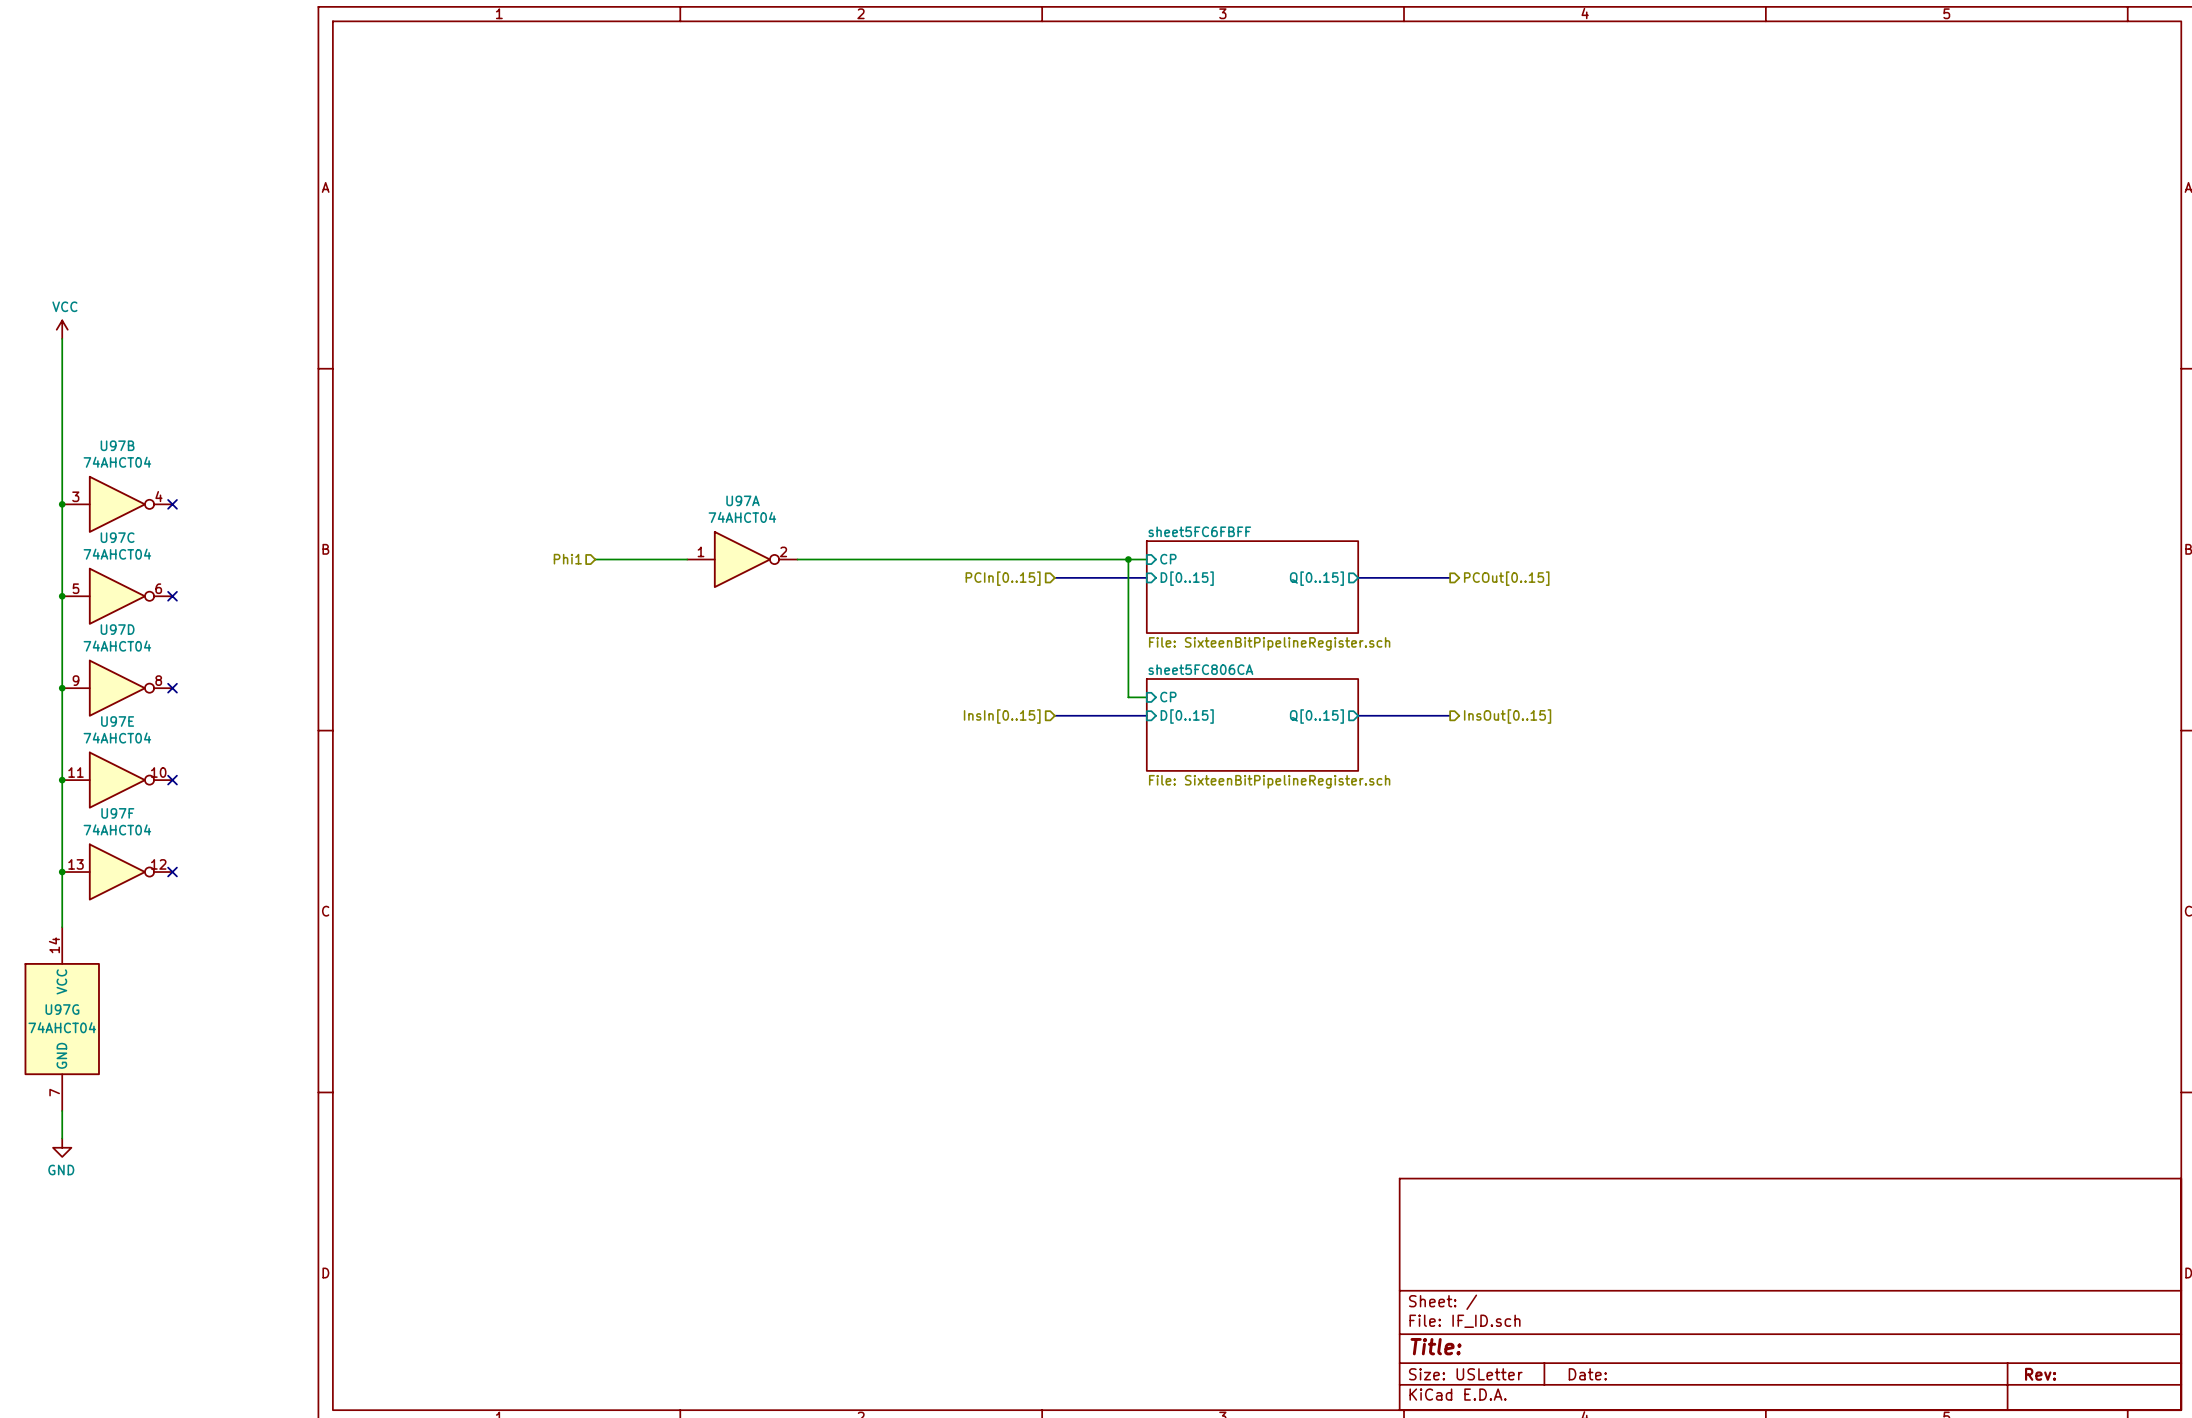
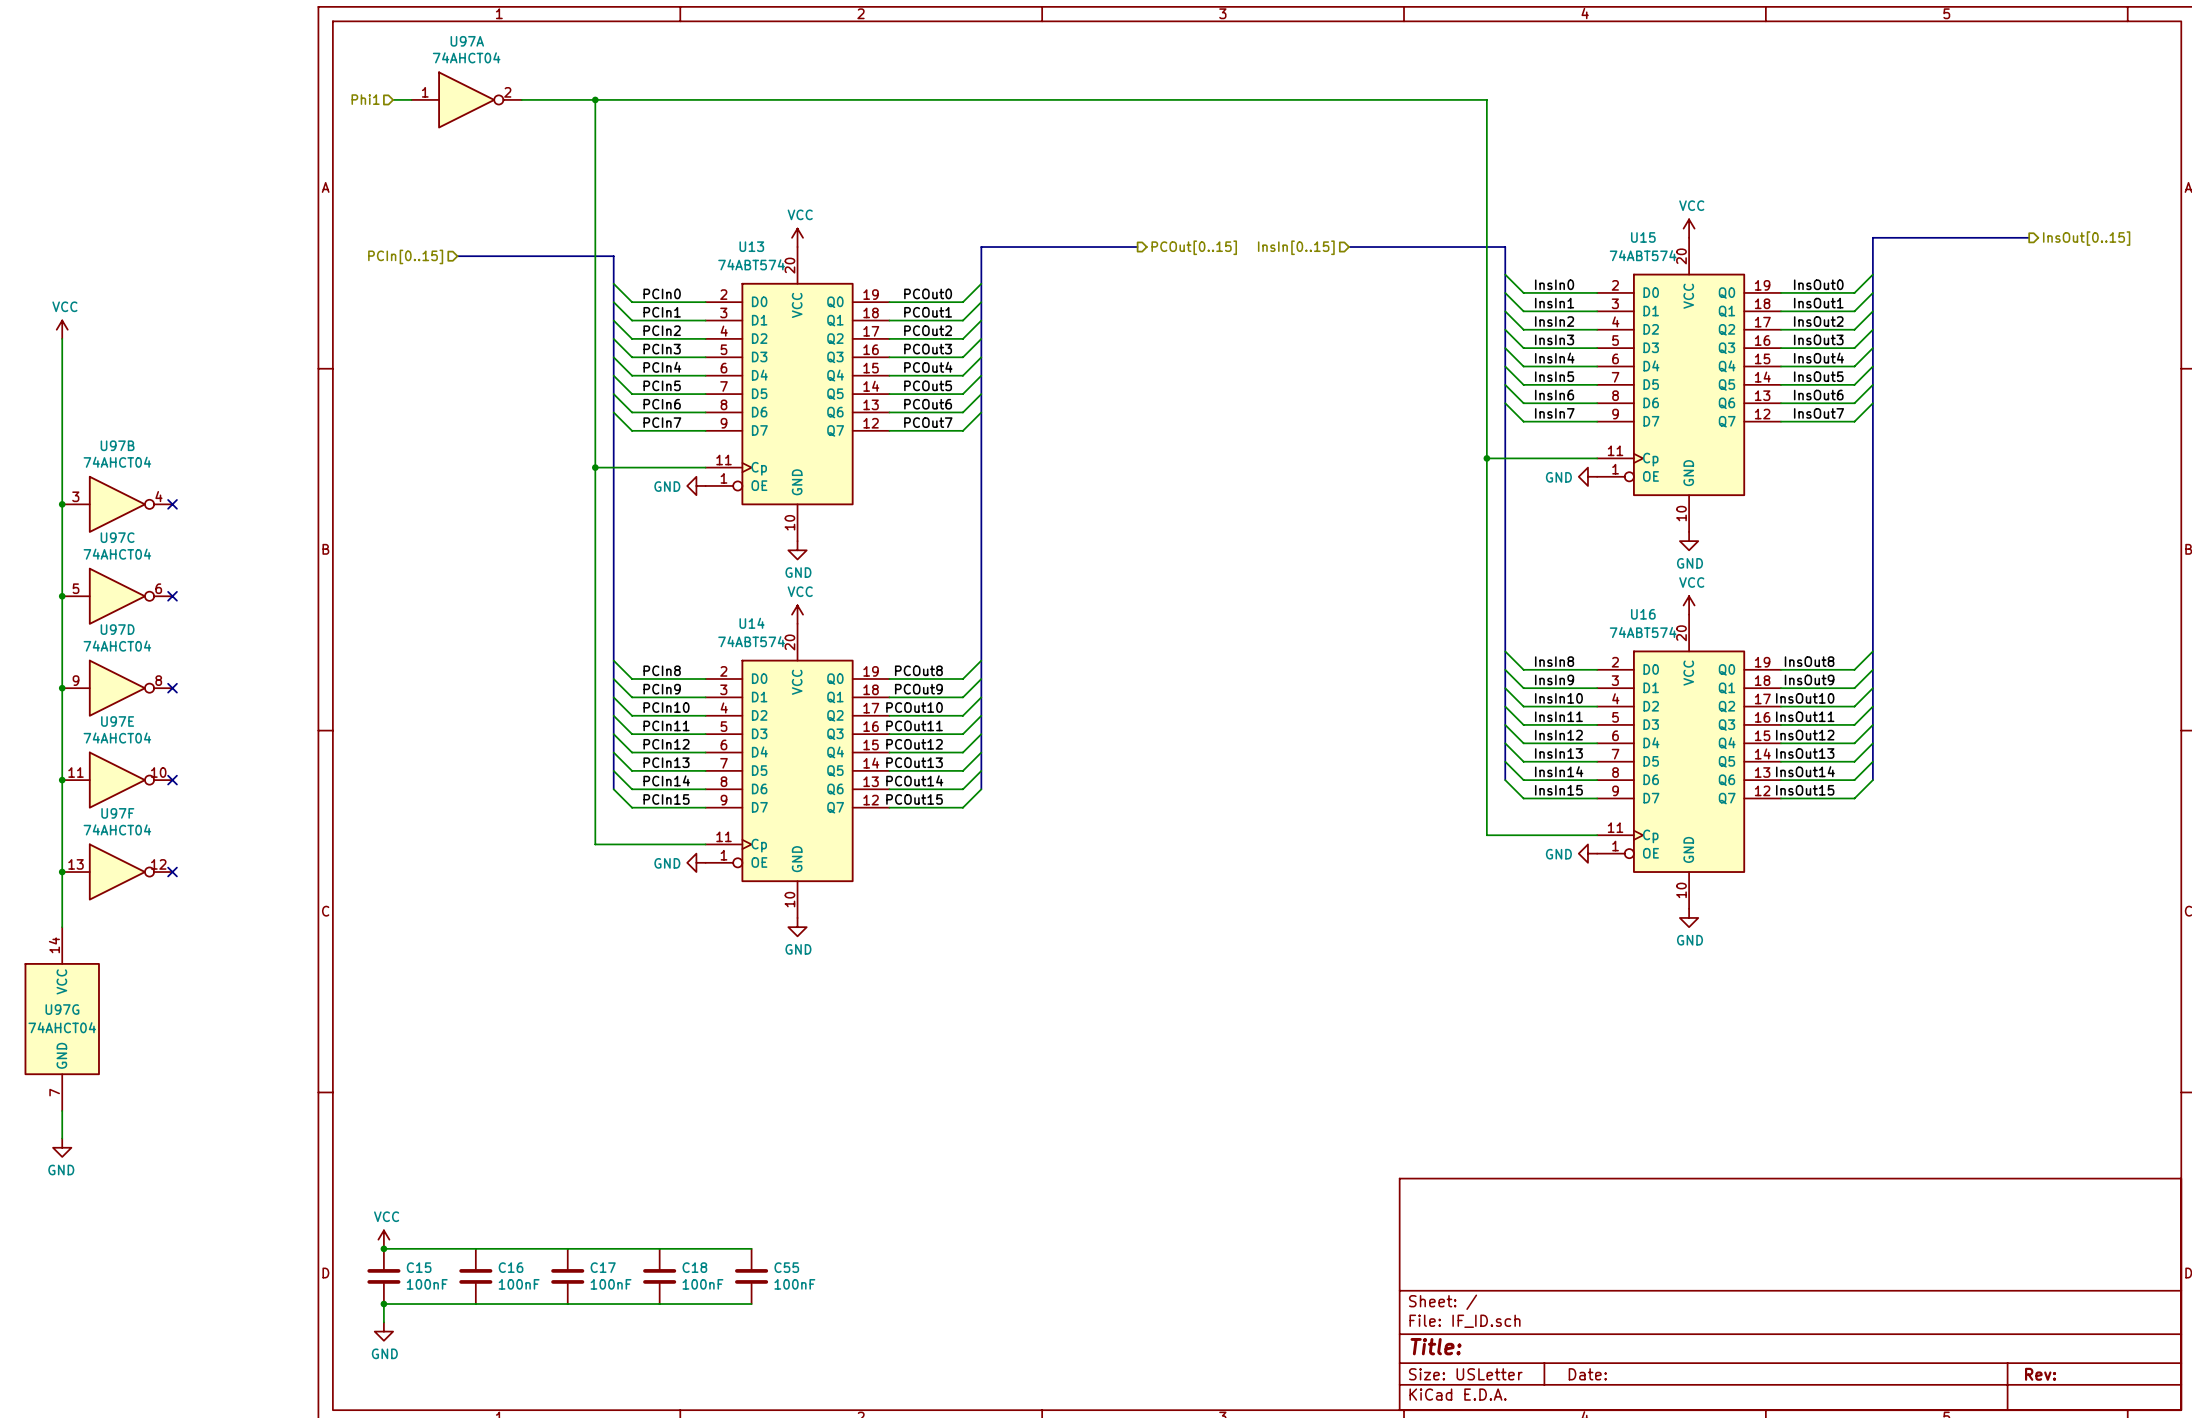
hierarchical label: none -> Phi1 (365, 99)
wire: none -> (393, 99) (411, 99)
wire: none -> (521, 99) (1486, 99) (1486, 835) (1597, 835)
wire: none -> (595, 99) (595, 844) (705, 844)
junction: none -> (595, 99)
power symbol: none -> VCC (1689, 228)
power symbol: none -> VCC (797, 237)
bus: none -> (2029, 237) (1872, 237) (1872, 780)
hierarchical label: none -> InsOut[0..15] (2086, 238)
bus: none -> (1137, 247) (981, 247) (981, 789)
hierarchical label: none -> PCOut[0..15] (1194, 247)
hierarchical label: none -> InsIn[0..15] (1296, 247)
bus: none -> (1349, 247) (1505, 247) (1505, 780)
hierarchical label: none -> PCIn[0..15] (405, 256)
bus: none -> (457, 256) (613, 256) (613, 789)
wire: none -> (1505, 274) (1523, 292) (1597, 292)
wire: none -> (1872, 274) (1854, 292) (1780, 292)
wire: none -> (613, 283) (632, 302) (705, 302)
wire: none -> (981, 283) (962, 302) (889, 302)
label: none -> InsIn0 (1554, 284)
label: none -> InsOut0 (1818, 284)
wire: none -> (1505, 292) (1523, 311) (1597, 311)
wire: none -> (1872, 292) (1854, 311) (1780, 311)
label: none -> PCIn0 (662, 293)
label: none -> PCOut0 (928, 293)
wire: none -> (613, 302) (632, 320) (705, 320)
wire: none -> (981, 302) (962, 320) (889, 320)
label: none -> InsIn1 (1554, 303)
label: none -> InsOut1 (1818, 303)
wire: none -> (1505, 311) (1523, 329) (1597, 329)
wire: none -> (1872, 311) (1854, 329) (1780, 329)
label: none -> PCIn1 (662, 312)
label: none -> PCOut1 (928, 312)
wire: none -> (613, 320) (632, 338) (705, 338)
wire: none -> (981, 320) (962, 338) (889, 338)
label: none -> InsIn2 (1554, 321)
label: none -> InsOut2 (1818, 321)
wire: none -> (1505, 329) (1523, 348) (1597, 348)
wire: none -> (1872, 329) (1854, 348) (1780, 348)
label: none -> PCIn2 (662, 330)
label: none -> PCOut2 (928, 330)
wire: none -> (613, 338) (632, 357) (705, 357)
wire: none -> (981, 338) (962, 357) (889, 357)
label: none -> InsIn3 (1554, 339)
label: none -> InsOut3 (1818, 339)
wire: none -> (1505, 348) (1523, 366) (1597, 366)
wire: none -> (1872, 348) (1854, 366) (1780, 366)
label: none -> PCIn3 (662, 349)
label: none -> PCOut3 (928, 349)
wire: none -> (613, 357) (632, 375) (705, 375)
wire: none -> (981, 357) (962, 375) (889, 375)
label: none -> InsIn4 (1554, 358)
label: none -> InsOut4 (1819, 358)
wire: none -> (1505, 366) (1523, 384) (1597, 384)
wire: none -> (1872, 366) (1854, 384) (1780, 384)
label: none -> PCIn4 (662, 367)
label: none -> PCOut4 (928, 367)
wire: none -> (613, 375) (632, 394) (705, 394)
wire: none -> (981, 375) (962, 394) (889, 394)
label: none -> InsIn5 (1554, 376)
label: none -> InsOut5 (1818, 376)
wire: none -> (1505, 384) (1523, 403) (1597, 403)
U15: none -> 74ABT574 (1689, 384)
wire: none -> (1872, 384) (1854, 403) (1780, 403)
label: none -> PCIn5 (662, 385)
label: none -> PCOut5 (928, 385)
wire: none -> (613, 394) (632, 412) (705, 412)
U13: none -> 74ABT574 (797, 394)
wire: none -> (981, 394) (962, 412) (889, 412)
label: none -> InsIn6 (1554, 395)
label: none -> InsOut6 (1818, 395)
wire: none -> (1505, 403) (1523, 421) (1597, 421)
wire: none -> (1872, 403) (1854, 421) (1780, 421)
label: none -> PCIn6 (662, 404)
label: none -> PCOut6 (928, 404)
wire: none -> (613, 412) (632, 430) (705, 430)
wire: none -> (981, 412) (962, 430) (889, 430)
label: none -> InsIn7 (1554, 413)
label: none -> InsOut7 (1819, 413)
label: none -> PCIn7 (662, 422)
label: none -> PCOut7 (928, 422)
wire: none -> (1486, 458) (1597, 458)
junction: none -> (1486, 458)
wire: none -> (595, 467) (705, 467)
junction: none -> (595, 467)
power symbol: none -> GND (1587, 476)
power symbol: none -> GND (696, 485)
power symbol: none -> GND (1689, 541)
power symbol: none -> GND (797, 550)
hierarchical label: Phi1 (567, 559) -> none
wire: (595, 559) (687, 559) -> none
U97A position: (742, 559) -> (466, 99)
wire: (797, 559) (1146, 559) -> none
wire: (1128, 559) (1128, 697) (1146, 697) -> none
junction: (1128, 559) -> none
sheet pin: CP (1168, 559) -> none
bus: (1054, 577) (1146, 577) -> none
bus: (1358, 577) (1450, 577) -> none
hierarchical label: PCIn[0..15] (1003, 578) -> none
sheet pin: D[0..15] (1187, 578) -> none
sheet pin: Q[0..15] (1316, 578) -> none
hierarchical label: PCOut[0..15] (1506, 578) -> none
sheet sheet5FC6FBFF: File: SixteenBitPipelineRegister.sch (1252, 587) -> none
power symbol: none -> VCC (1689, 605)
power symbol: none -> VCC (797, 614)
wire: none -> (1505, 651) (1523, 669) (1597, 669)
wire: none -> (1872, 651) (1854, 669) (1780, 669)
wire: none -> (613, 660) (632, 678) (705, 678)
wire: none -> (981, 660) (962, 678) (889, 678)
label: none -> InsIn8 (1554, 661)
label: none -> InsOut8 (1809, 661)
wire: none -> (1505, 669) (1523, 688) (1597, 688)
wire: none -> (1872, 669) (1854, 688) (1780, 688)
label: none -> PCIn8 (662, 670)
label: none -> PCOut8 (918, 670)
wire: none -> (613, 678) (632, 697) (705, 697)
wire: none -> (981, 678) (962, 697) (889, 697)
label: none -> InsIn9 (1554, 679)
label: none -> InsOut9 (1809, 679)
wire: none -> (1505, 688) (1523, 706) (1597, 706)
wire: none -> (1872, 688) (1854, 706) (1780, 706)
label: none -> PCIn9 (662, 689)
label: none -> PCOut9 (918, 689)
wire: none -> (613, 697) (632, 715) (705, 715)
wire: none -> (981, 697) (962, 715) (889, 715)
sheet pin: CP (1168, 697) -> none
label: none -> InsIn10 (1558, 698)
label: none -> InsOut10 (1805, 698)
wire: none -> (1505, 706) (1523, 724) (1597, 724)
wire: none -> (1872, 706) (1854, 724) (1780, 724)
label: none -> PCIn10 (666, 707)
label: none -> PCOut10 (914, 707)
wire: none -> (613, 715) (632, 734) (705, 734)
wire: none -> (981, 715) (962, 734) (889, 734)
bus: (1054, 715) (1146, 715) -> none
bus: (1358, 715) (1450, 715) -> none
hierarchical label: InsIn[0..15] (1002, 716) -> none
sheet pin: D[0..15] (1187, 716) -> none
sheet pin: Q[0..15] (1316, 716) -> none
hierarchical label: InsOut[0..15] (1507, 716) -> none
label: none -> InsIn11 (1558, 716)
label: none -> InsOut11 (1805, 716)
sheet sheet5FC806CA: File: SixteenBitPipelineRegister.sch (1252, 724) -> none
wire: none -> (1505, 724) (1523, 743) (1597, 743)
wire: none -> (1872, 724) (1854, 743) (1780, 743)
label: none -> PCIn11 (666, 725)
label: none -> PCOut11 (914, 725)
wire: none -> (613, 734) (632, 752) (705, 752)
wire: none -> (981, 734) (962, 752) (889, 752)
label: none -> InsIn12 (1558, 735)
label: none -> InsOut12 (1805, 735)
wire: none -> (1505, 743) (1523, 761) (1597, 761)
wire: none -> (1872, 743) (1854, 761) (1780, 761)
label: none -> PCIn12 (666, 744)
label: none -> PCOut12 (914, 744)
wire: none -> (613, 752) (632, 770) (705, 770)
wire: none -> (981, 752) (962, 770) (889, 770)
label: none -> InsIn13 (1558, 753)
label: none -> InsOut13 (1805, 753)
wire: none -> (1505, 761) (1523, 780) (1597, 780)
U16: none -> 74ABT574 (1689, 761)
wire: none -> (1872, 761) (1854, 780) (1780, 780)
label: none -> PCIn13 (666, 762)
label: none -> PCOut13 (914, 762)
wire: none -> (613, 770) (632, 789) (705, 789)
U14: none -> 74ABT574 (797, 770)
wire: none -> (981, 770) (962, 789) (889, 789)
label: none -> InsIn14 (1559, 771)
label: none -> InsOut14 (1805, 771)
label: none -> PCIn14 (666, 780)
label: none -> PCOut14 (914, 780)
wire: none -> (1505, 780) (1523, 798) (1597, 798)
wire: none -> (1872, 780) (1854, 798) (1780, 798)
wire: none -> (613, 789) (632, 807) (705, 807)
wire: none -> (981, 789) (962, 807) (889, 807)
label: none -> InsIn15 (1558, 790)
label: none -> InsOut15 (1805, 790)
label: none -> PCIn15 (666, 799)
label: none -> PCOut15 (914, 799)
power symbol: none -> GND (1587, 853)
power symbol: none -> GND (696, 862)
power symbol: none -> GND (1689, 917)
power symbol: none -> GND (797, 927)
power symbol: none -> VCC (383, 1239)
wire: none -> (383, 1248) (751, 1248)
junction: none -> (383, 1248)
C15: none -> 100nF (383, 1276)
C16: none -> 100nF (475, 1276)
C17: none -> 100nF (567, 1276)
C18: none -> 100nF (659, 1276)
C55: none -> 100nF (751, 1276)
junction: none -> (383, 1304)
wire: none -> (751, 1304) (383, 1304) (383, 1322)
power symbol: none -> GND (383, 1331)

